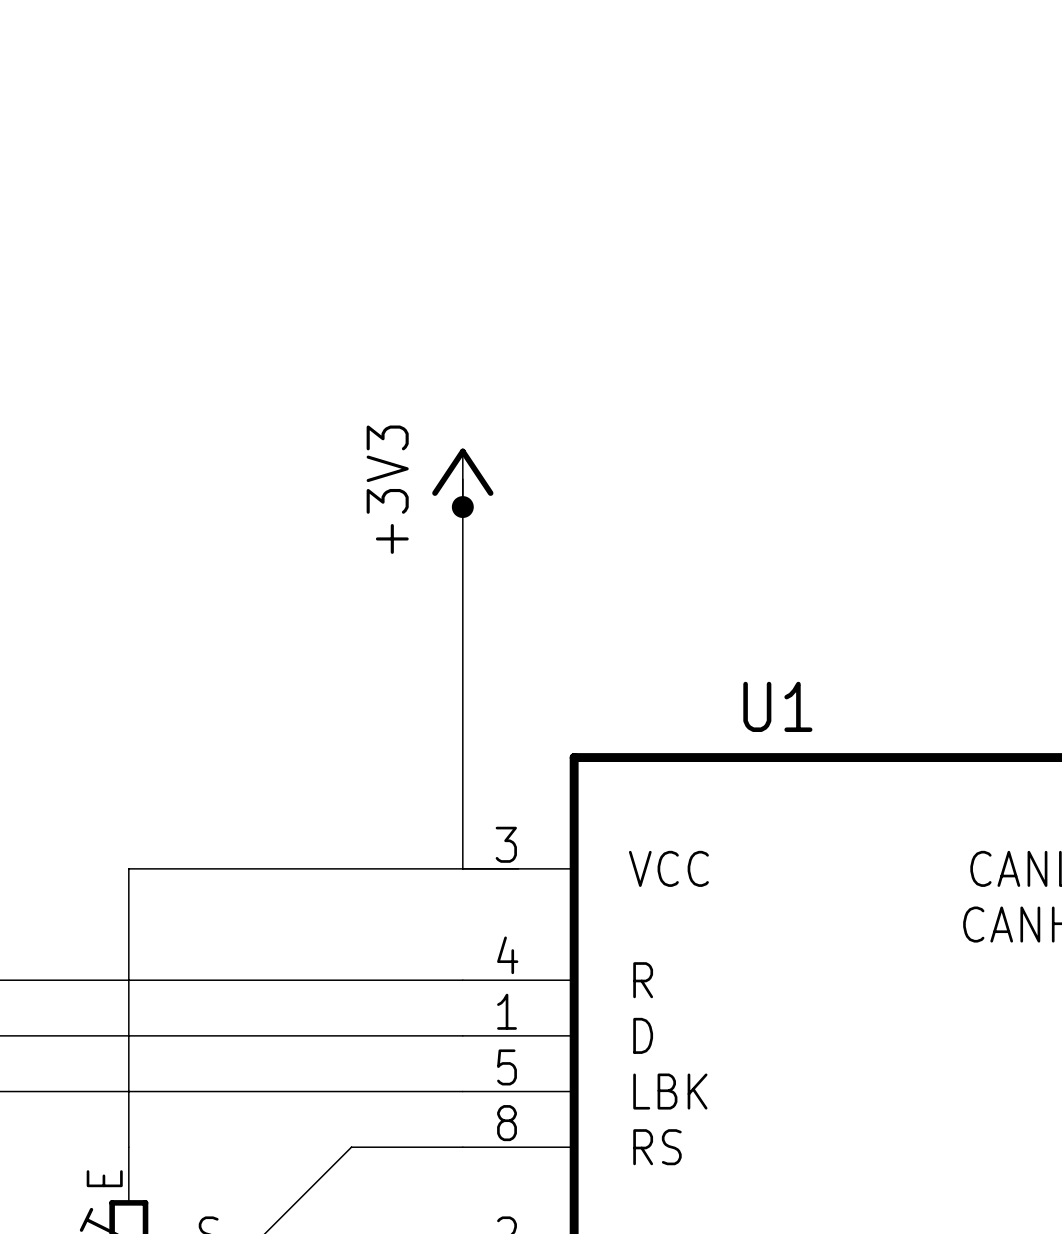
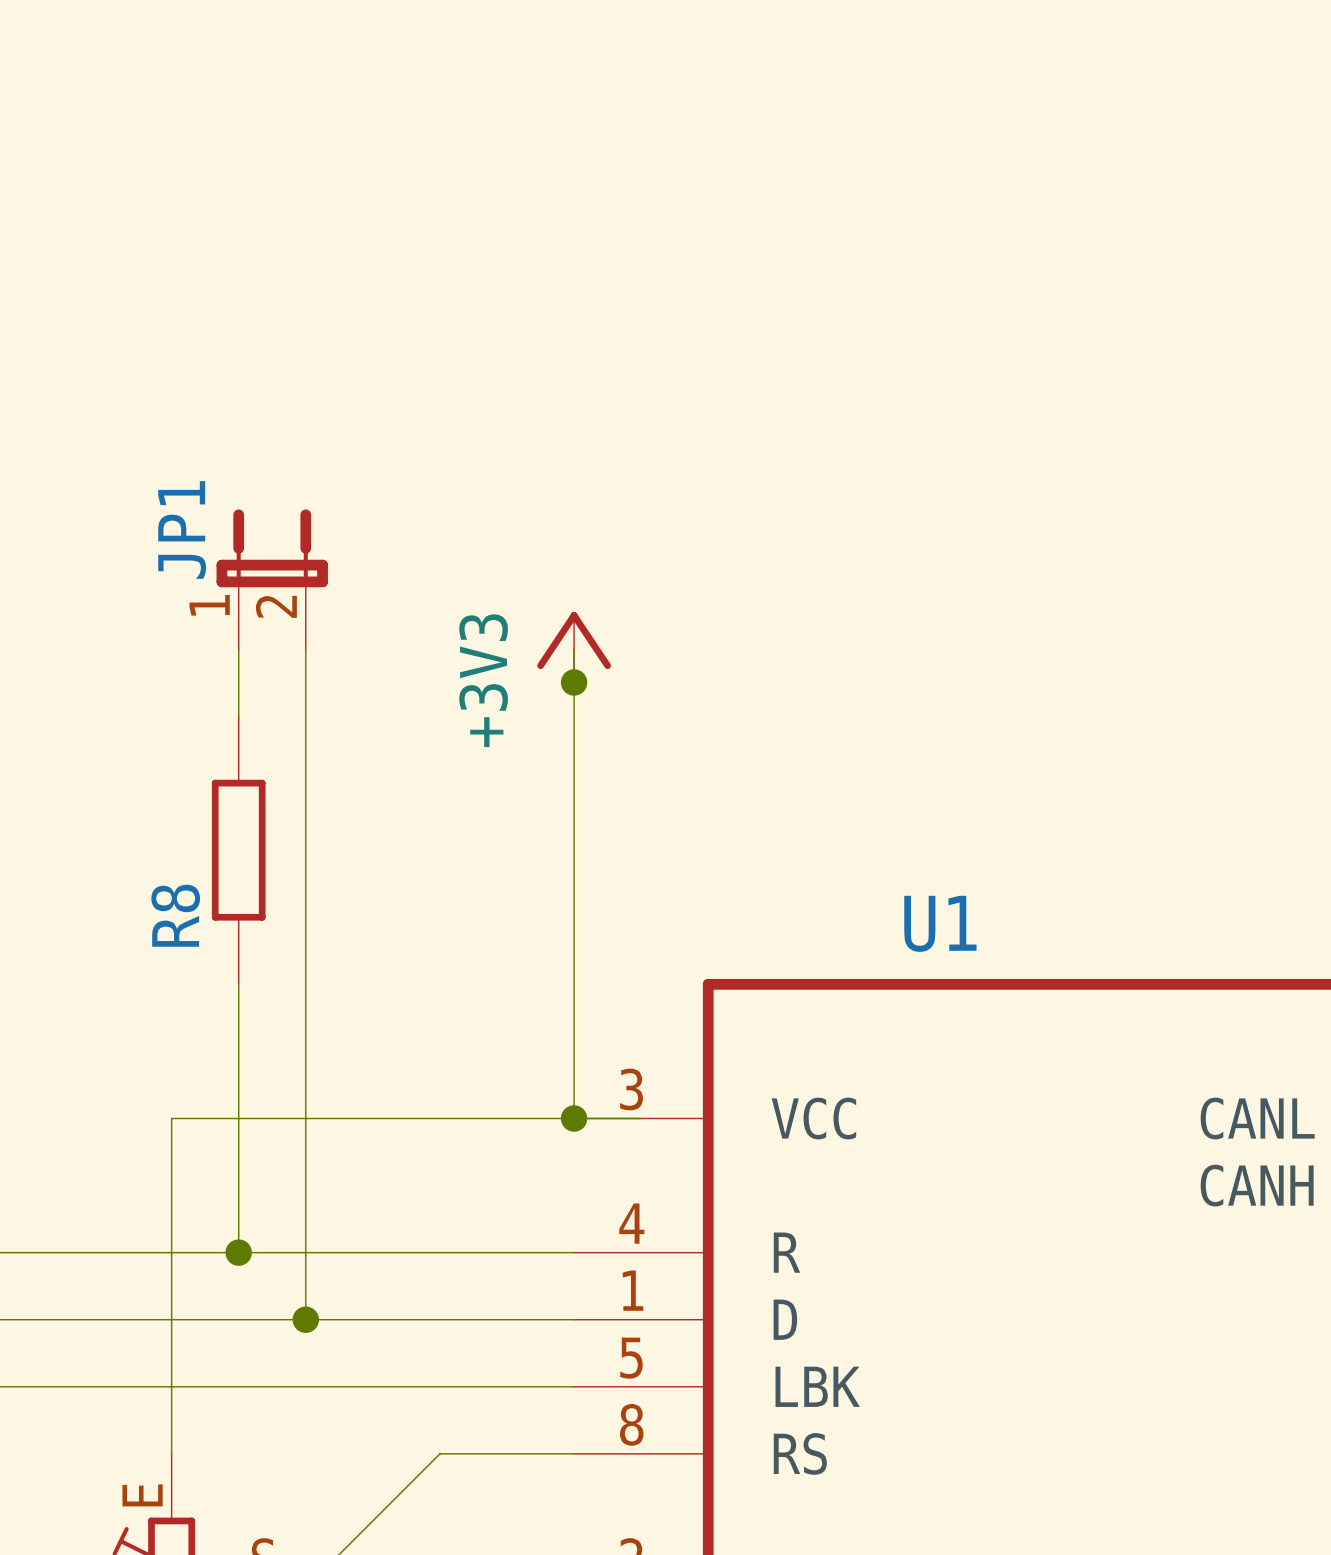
JP1: none -> (272, 579)
wire: none -> (238, 648) (238, 716)
wire: none -> (305, 648) (305, 1319)
R8: none -> (238, 850)
wire: none -> (238, 984) (238, 1252)
junction: none -> (574, 1118)
junction: none -> (238, 1252)
junction: none -> (305, 1319)

